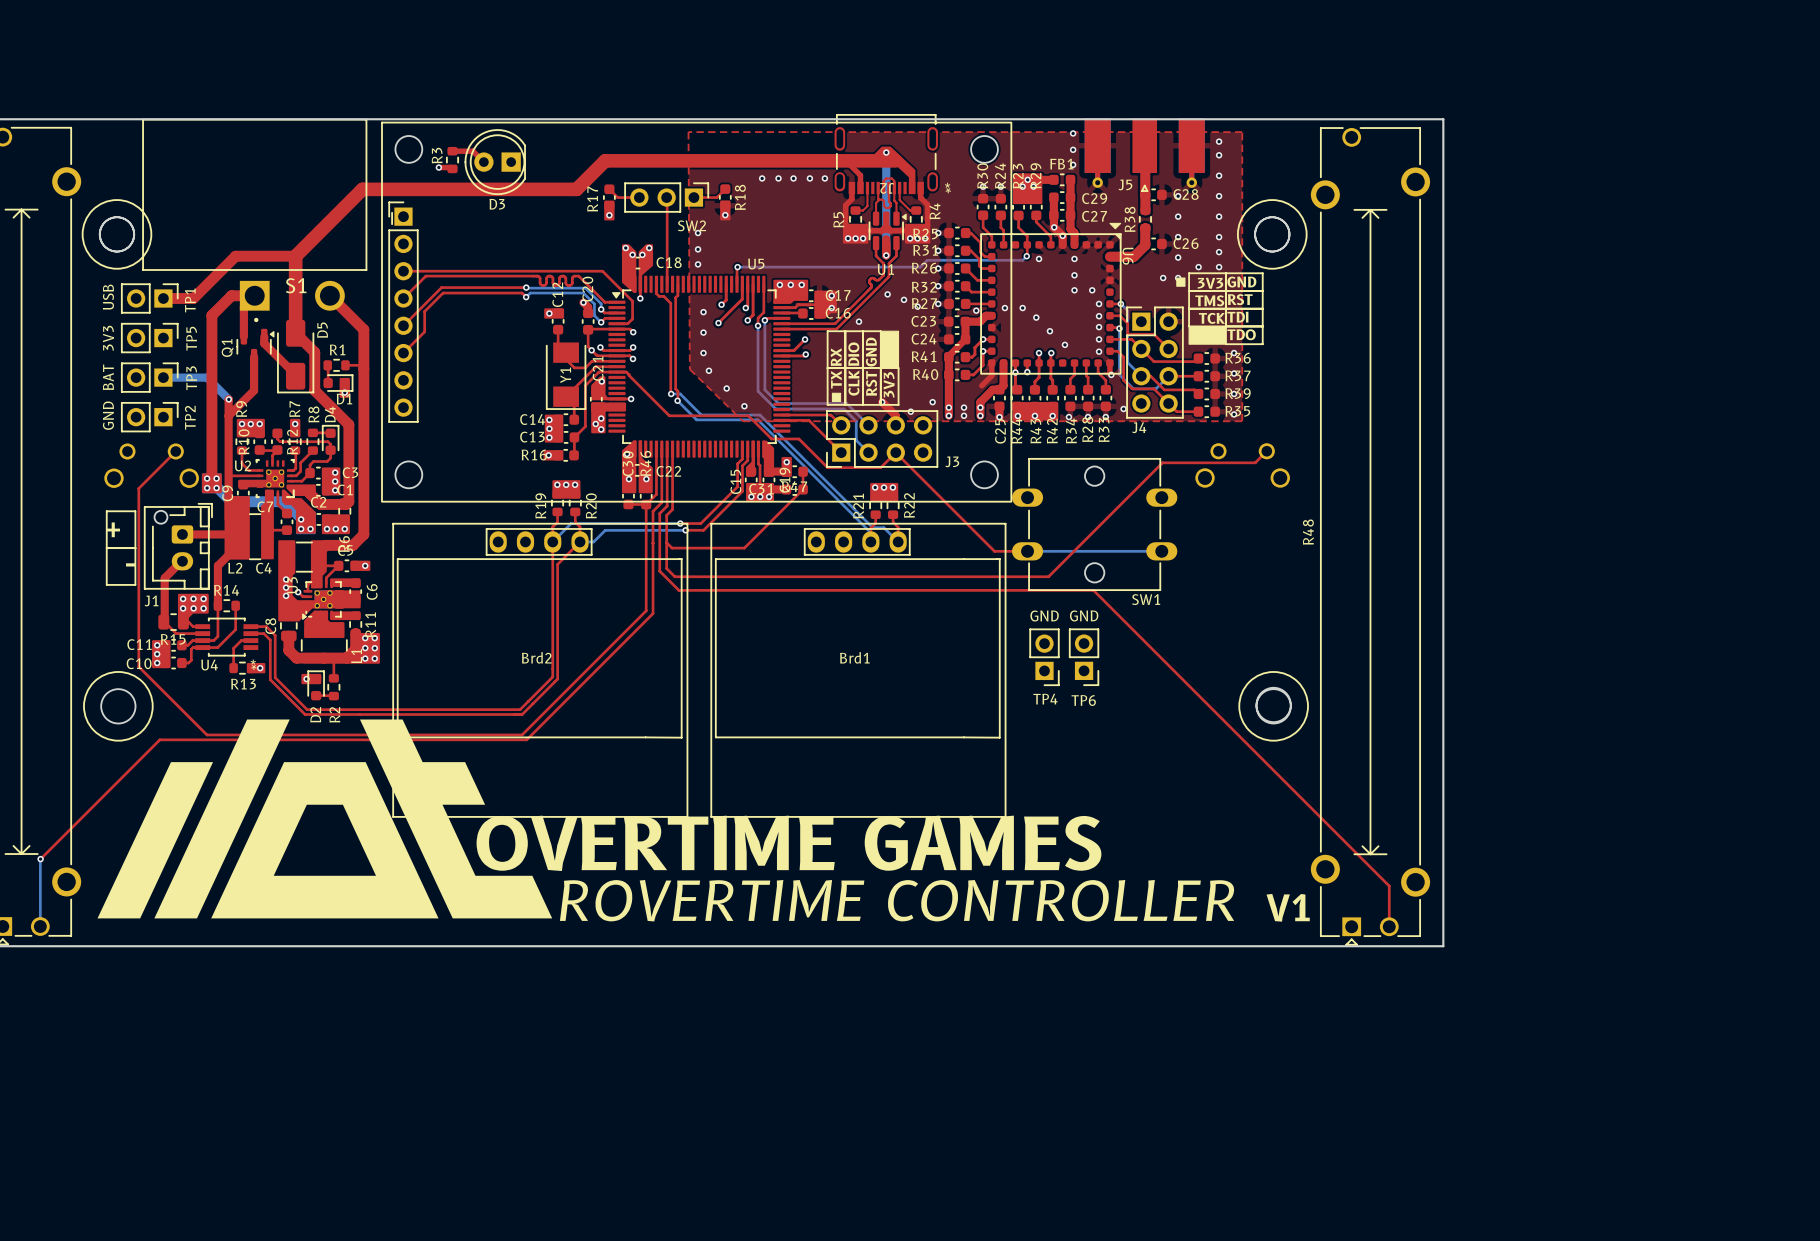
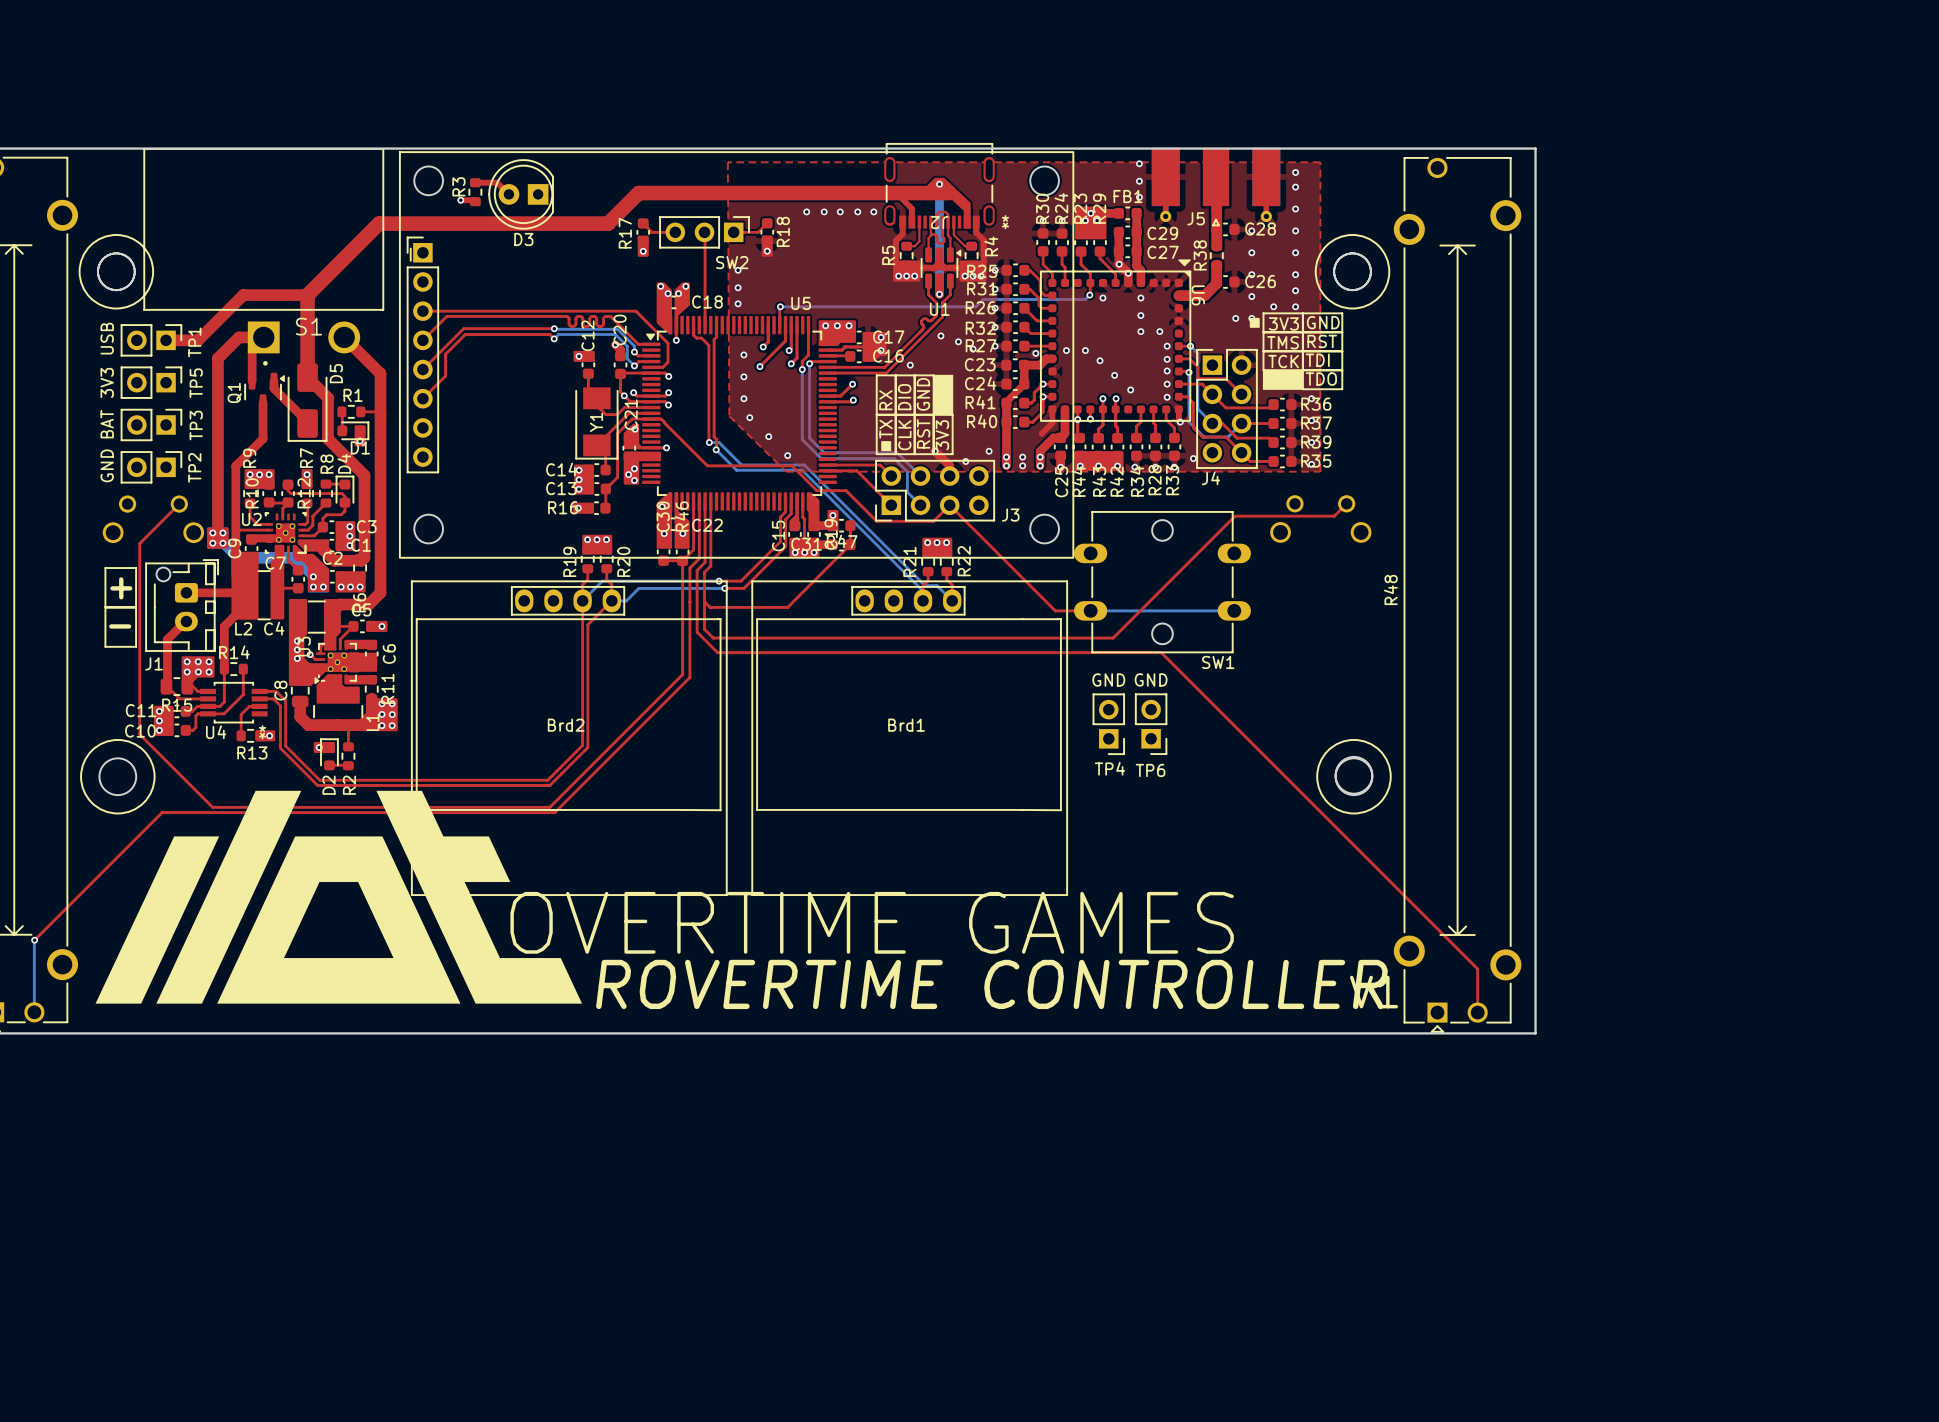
bottom track: (163, 377) (207, 377) (228, 399) -> none
top track: (228, 399) (228, 416) -> none
via: (228, 399) -> none

